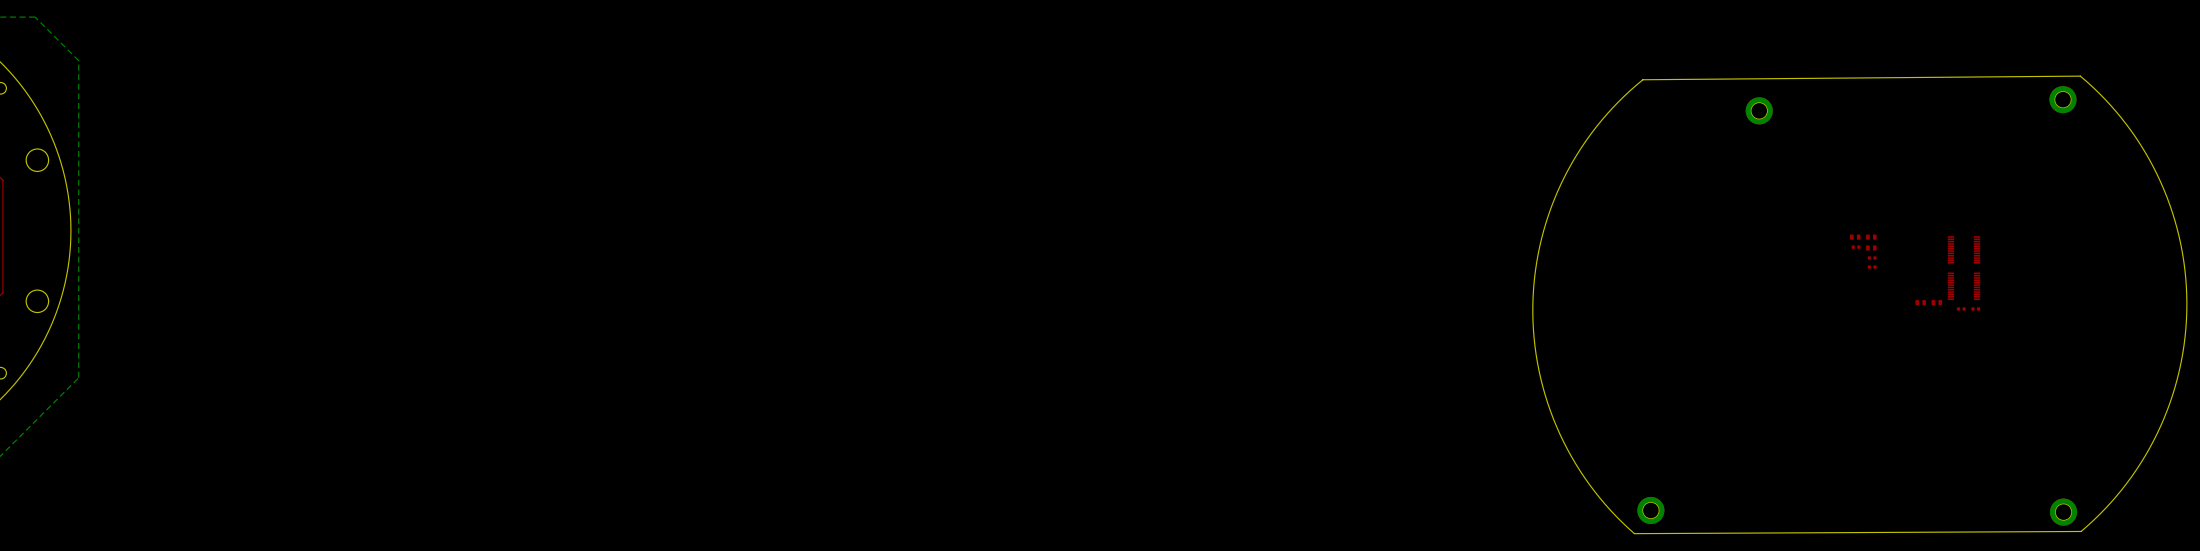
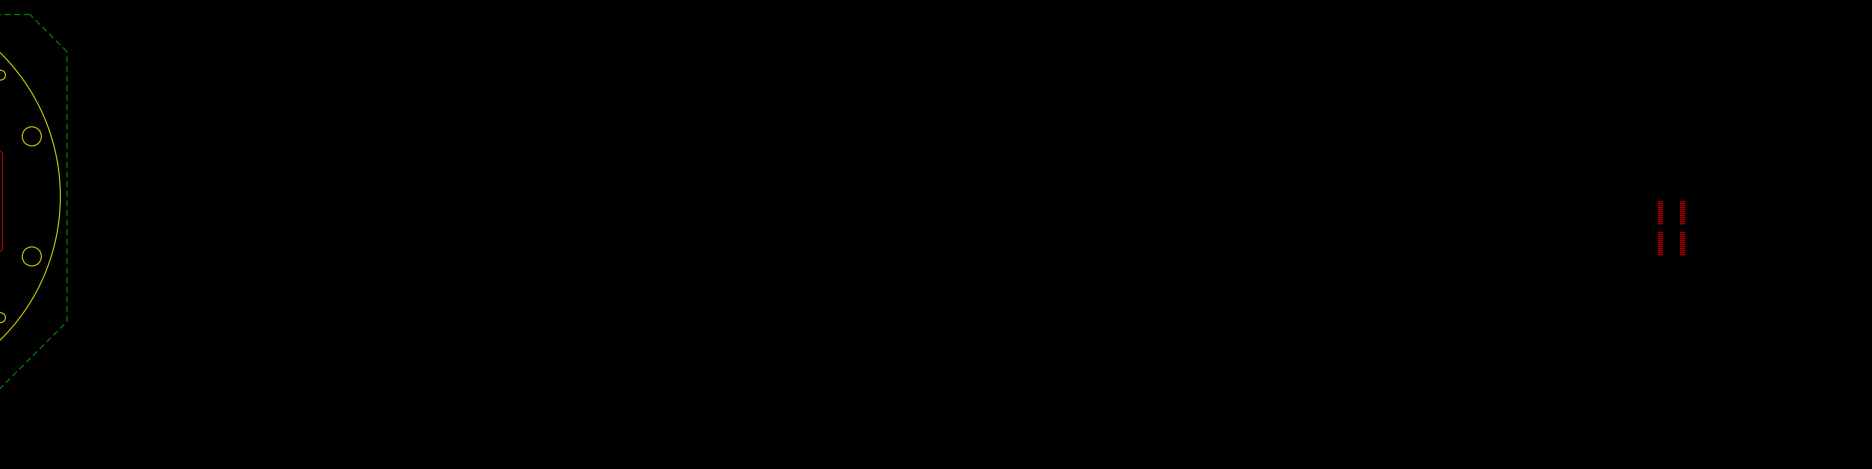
board edge: (2080, 76) (1642, 79) (1630, 90) (1591, 133) (1561, 183) (1541, 238) (1533, 296) (1536, 354) (1550, 411) (1575, 463) (1610, 510) (1634, 533) (2081, 531) (2093, 520) (2131, 476) (2149, 447) (2164, 417) (2181, 361) (2185, 328) (2186, 295) (2179, 237) (2169, 205) (2157, 174) (2140, 145) (2121, 117) (2080, 76) -> none
part: (2062, 99) -> none
part: (1759, 110) -> none
part: (1855, 237) -> none
part: (1871, 237) -> none
part: (1856, 247) -> none
part: (1871, 248) -> none
part: (1872, 258) -> none
part: (1872, 267) -> none
part: (1920, 302) -> none
part: (1936, 302) -> none
part: (1961, 308) -> none
part: (1975, 308) -> none
part: (1650, 510) -> none
part: (2063, 512) -> none

